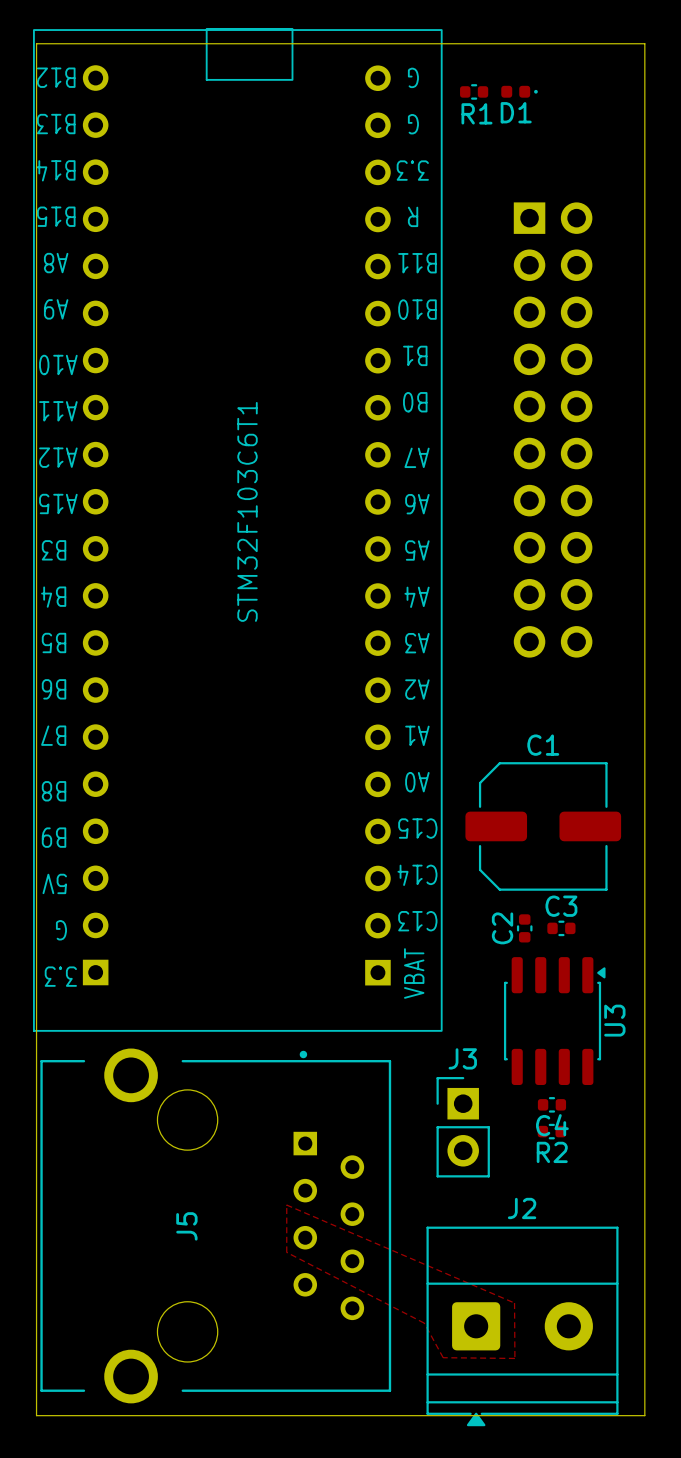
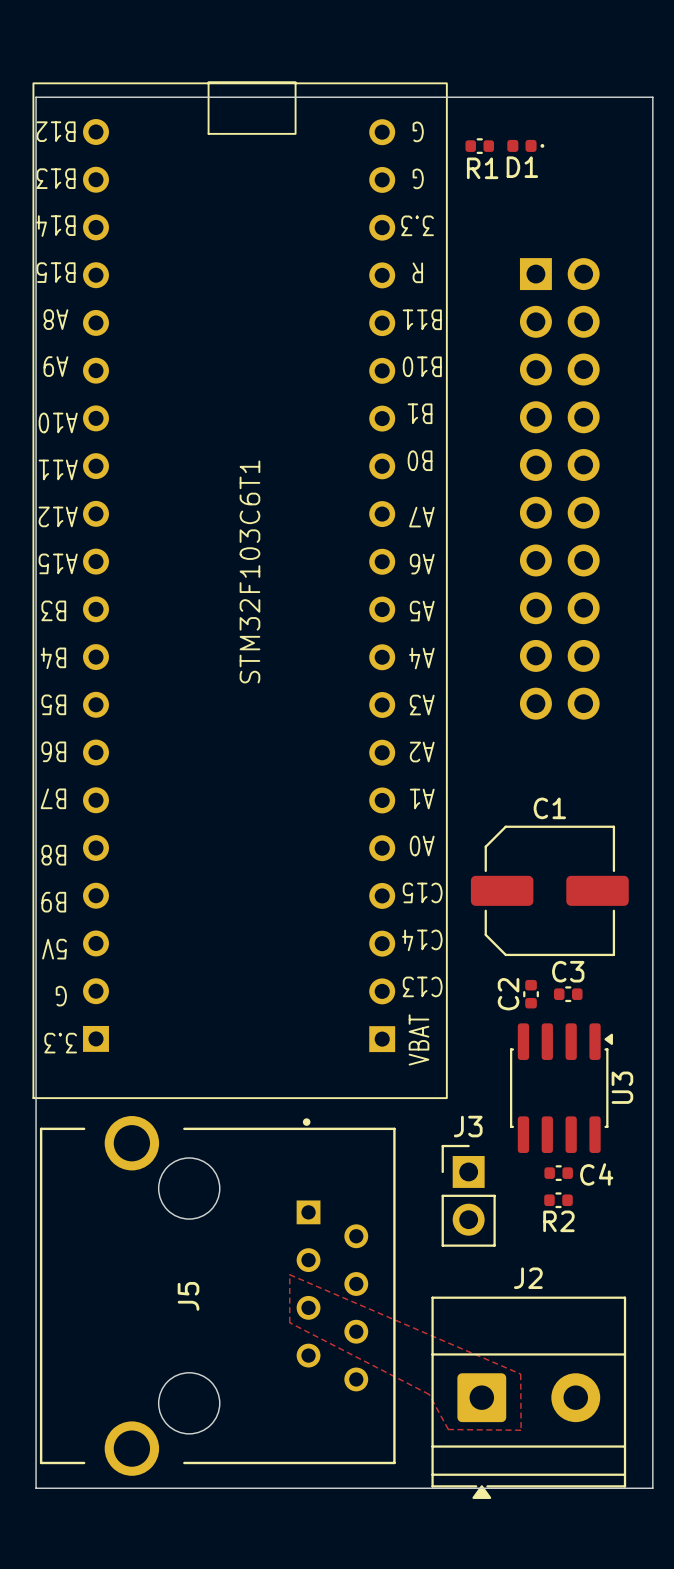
C4 name position: C4 (552, 1125) -> C4 (596, 1174)

